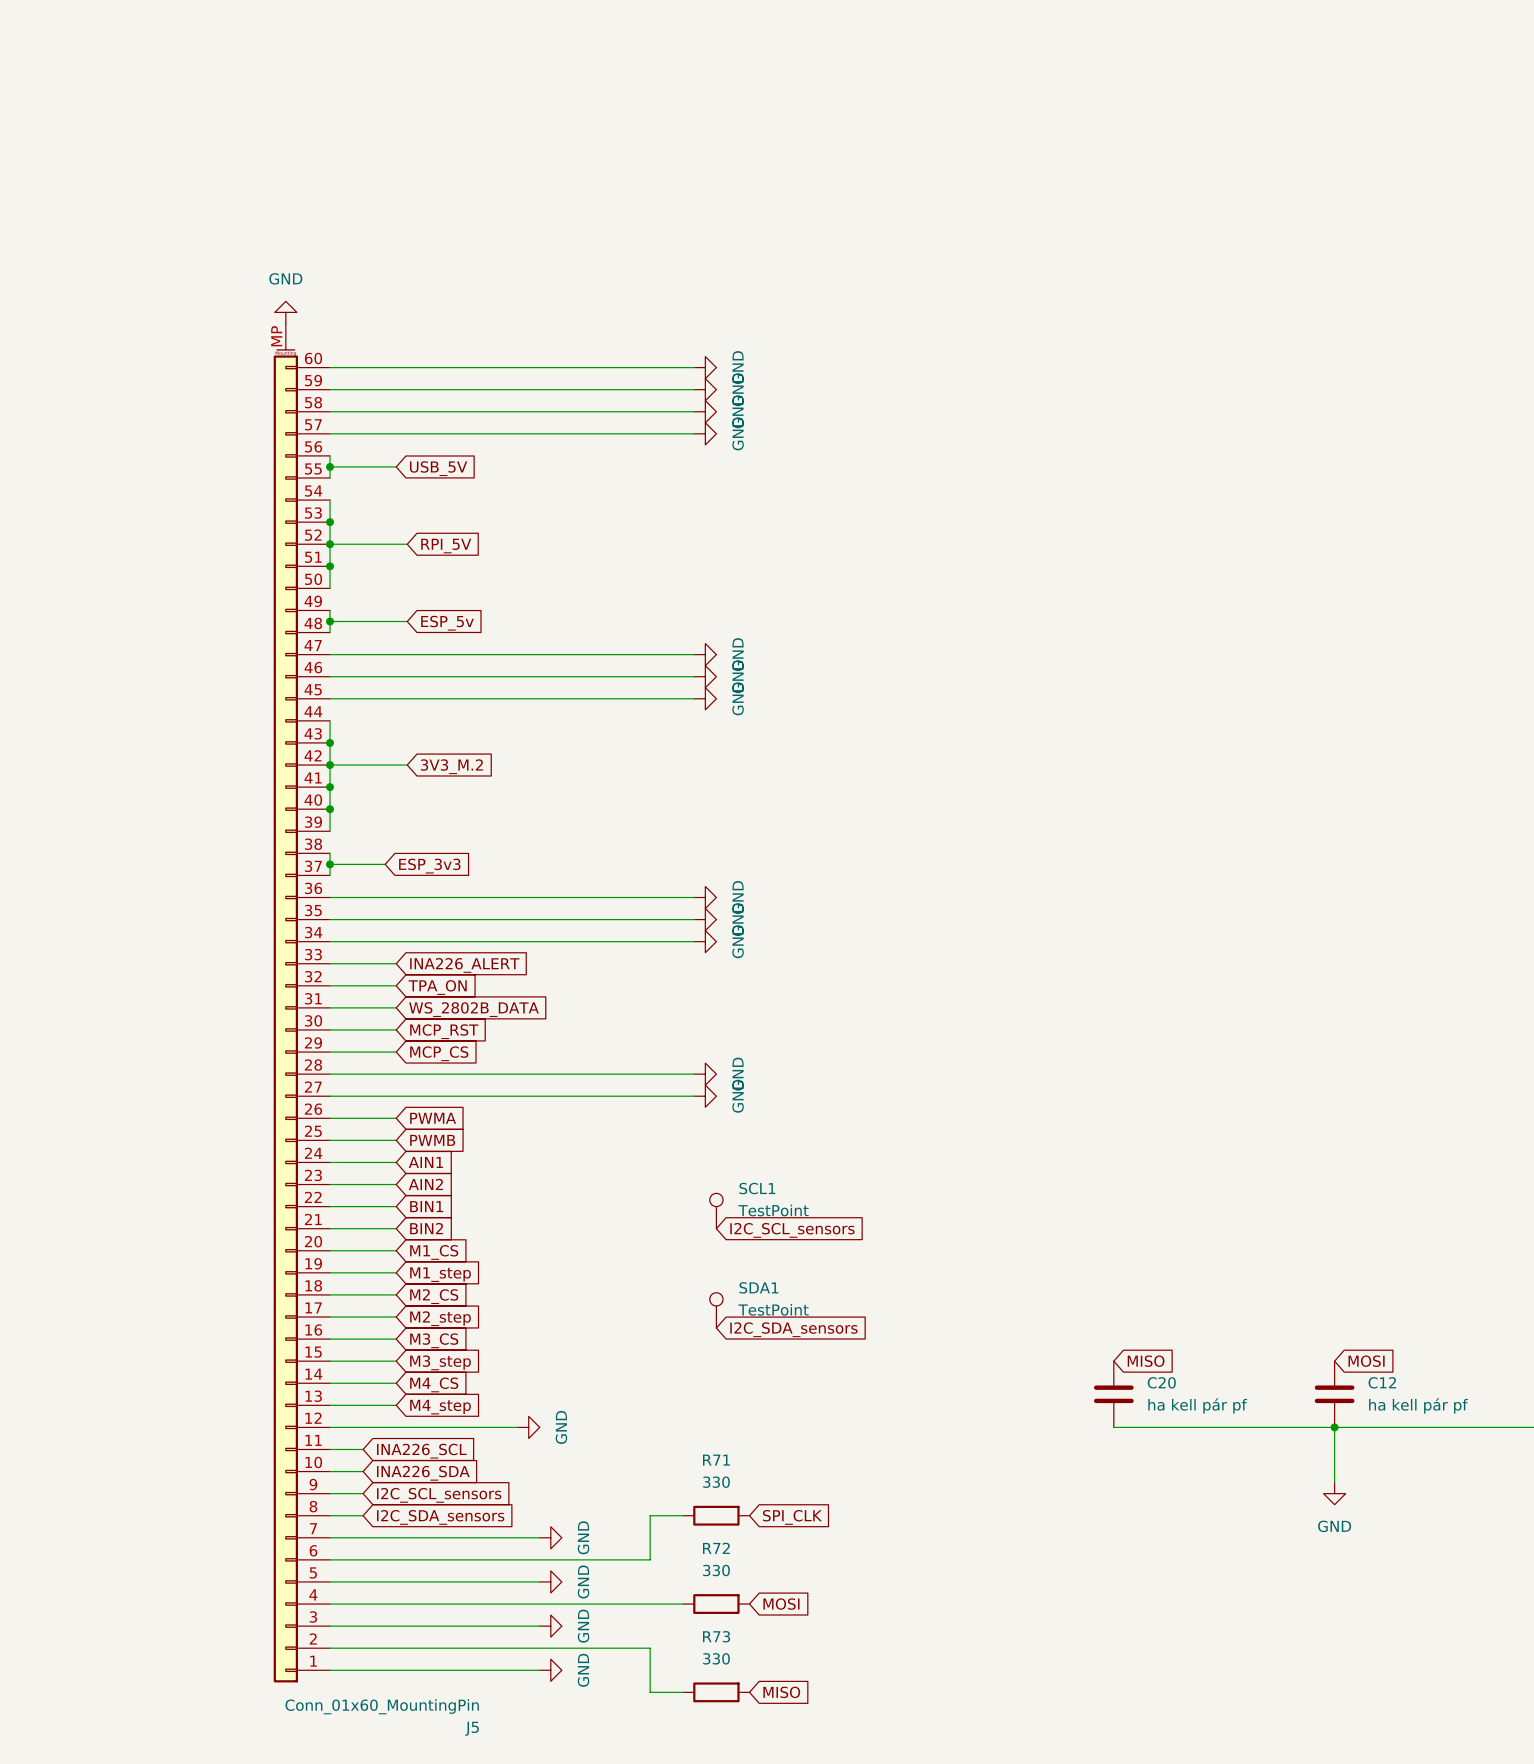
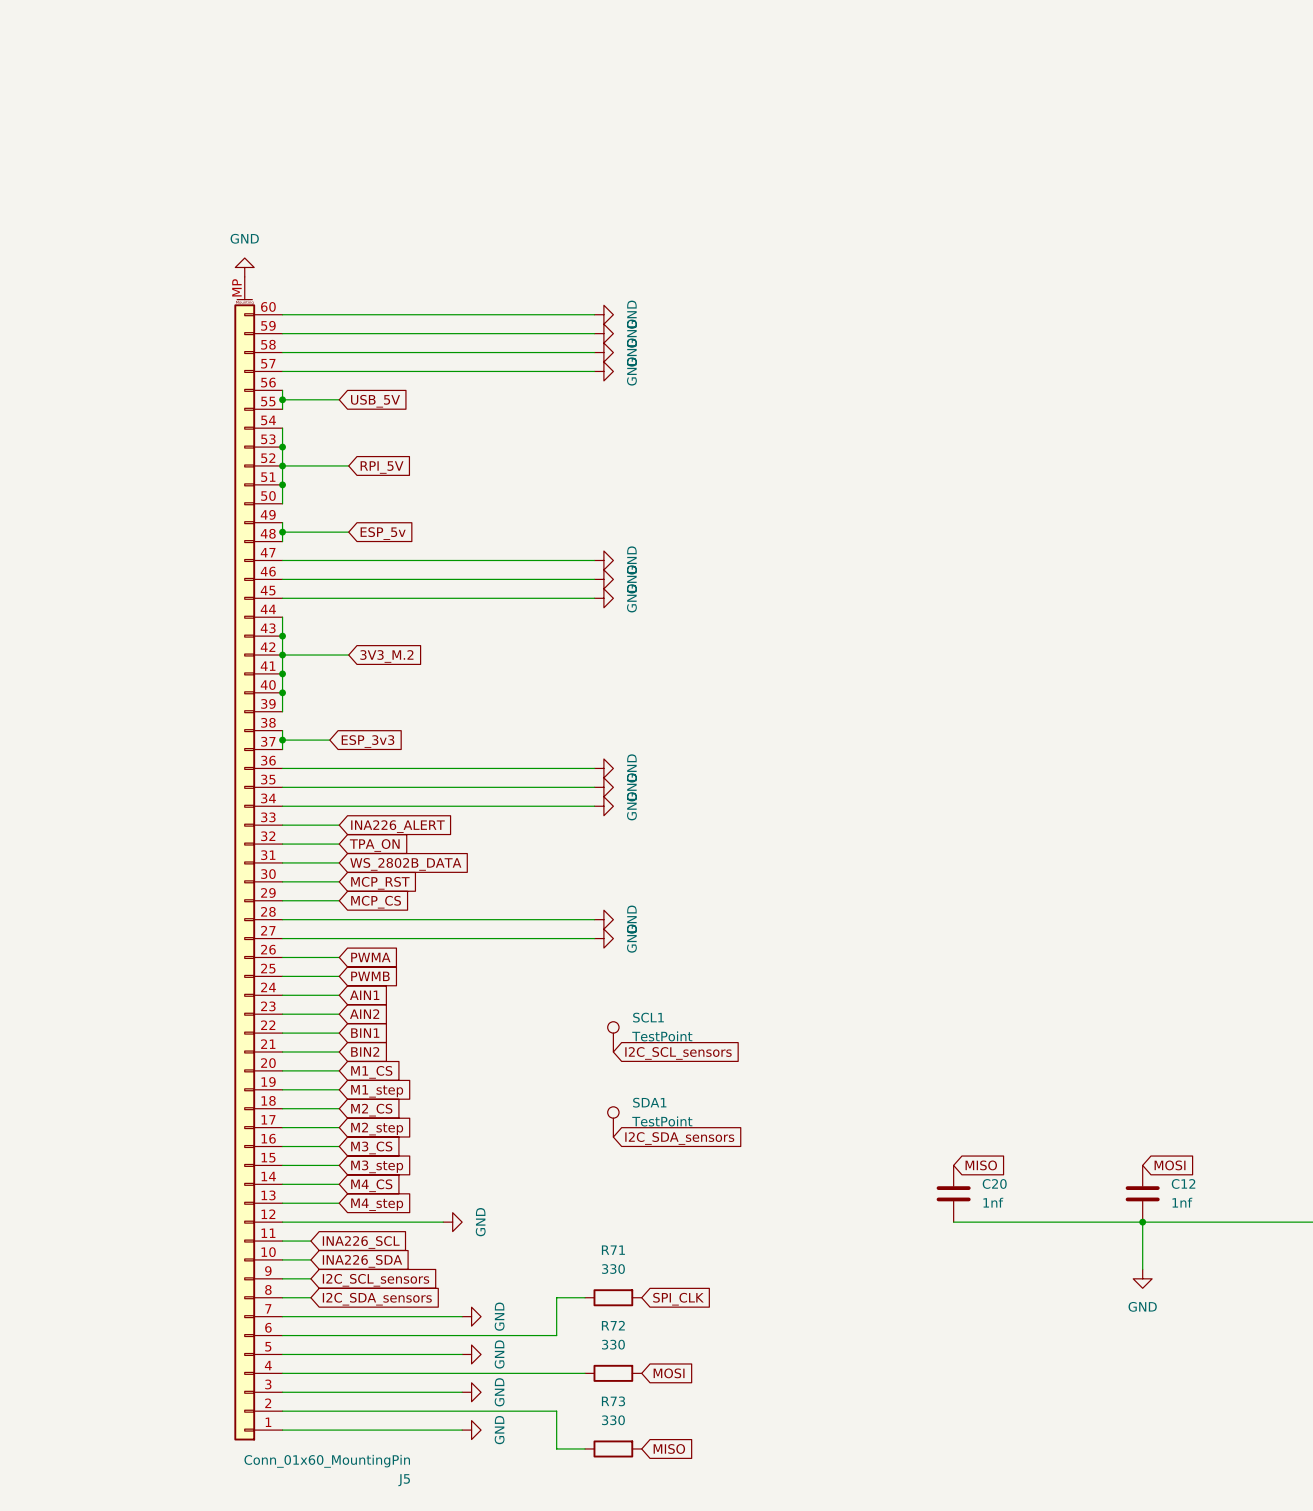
C20 value: ha kell pár pf (1197, 1405) -> 1nf (993, 1202)
C12 value: ha kell pár pf (1418, 1405) -> 1nf (1182, 1202)

